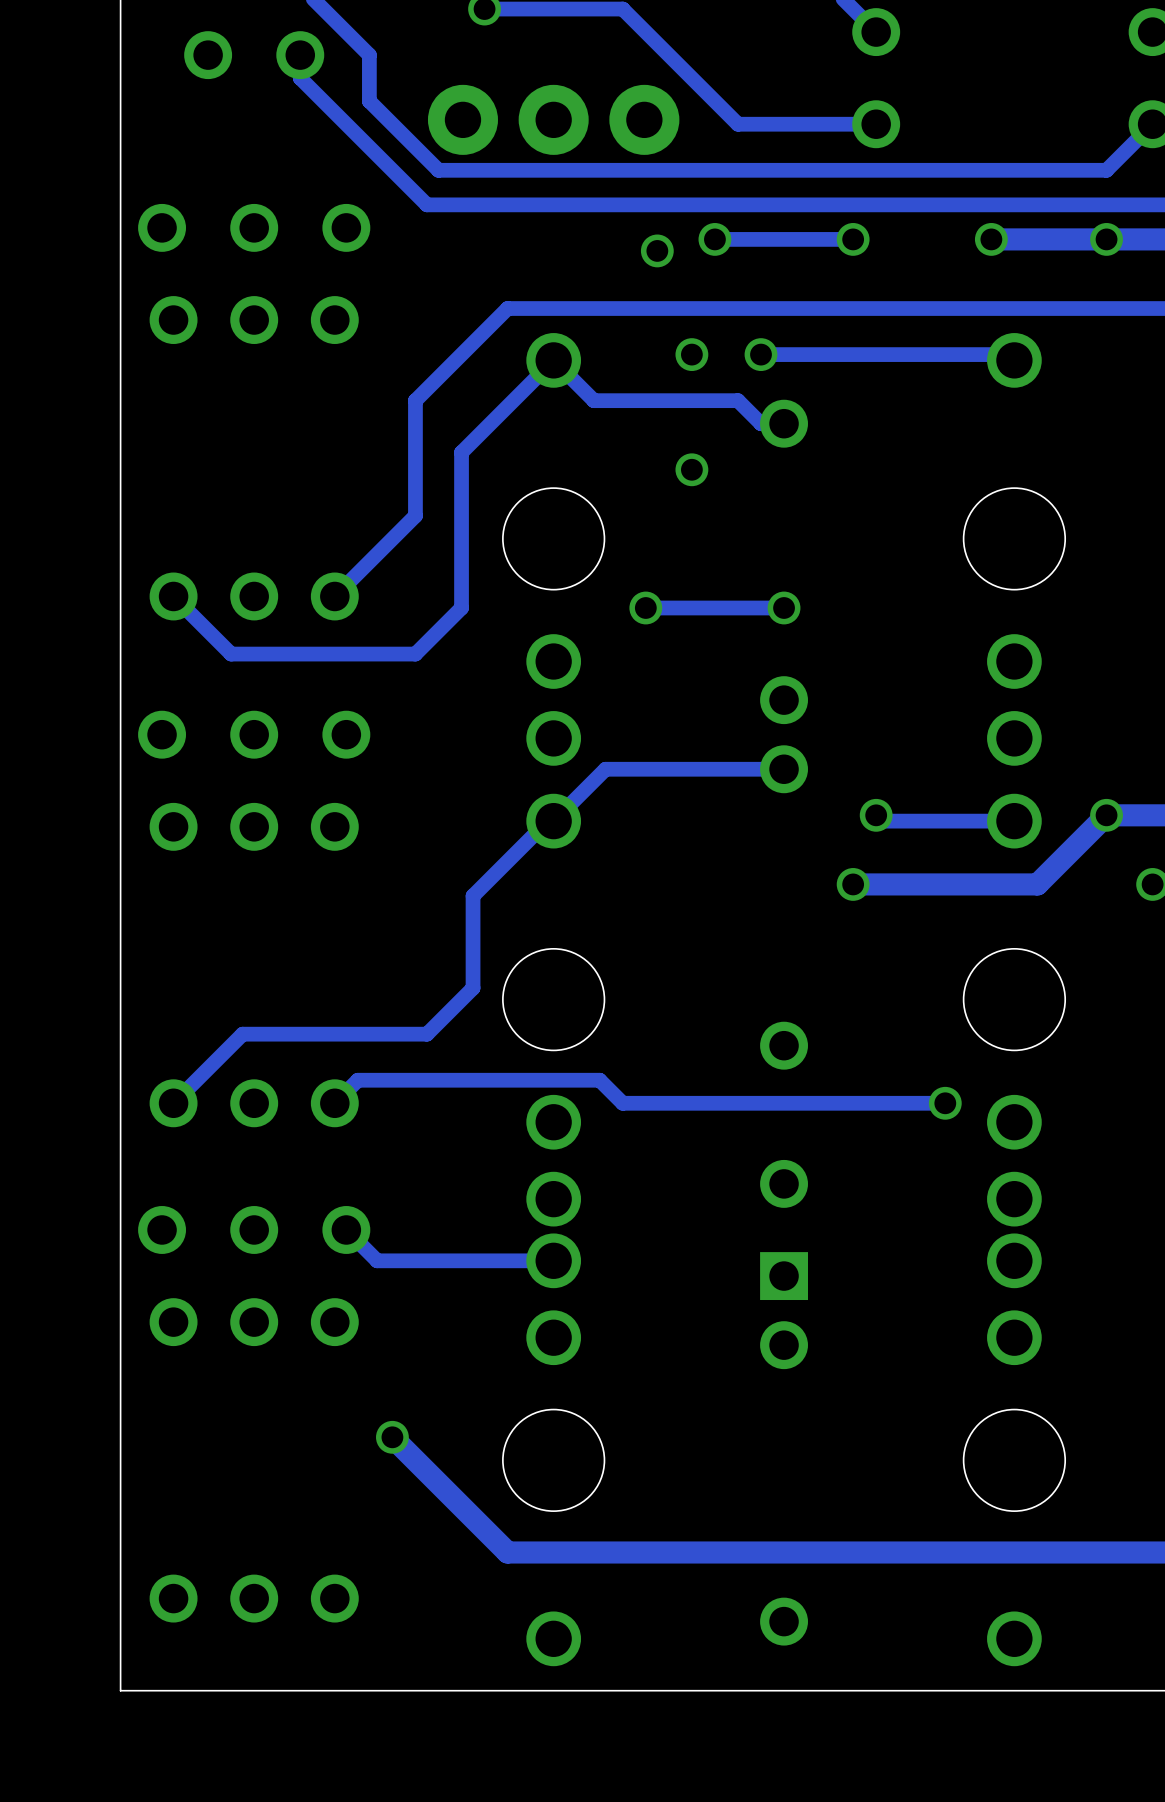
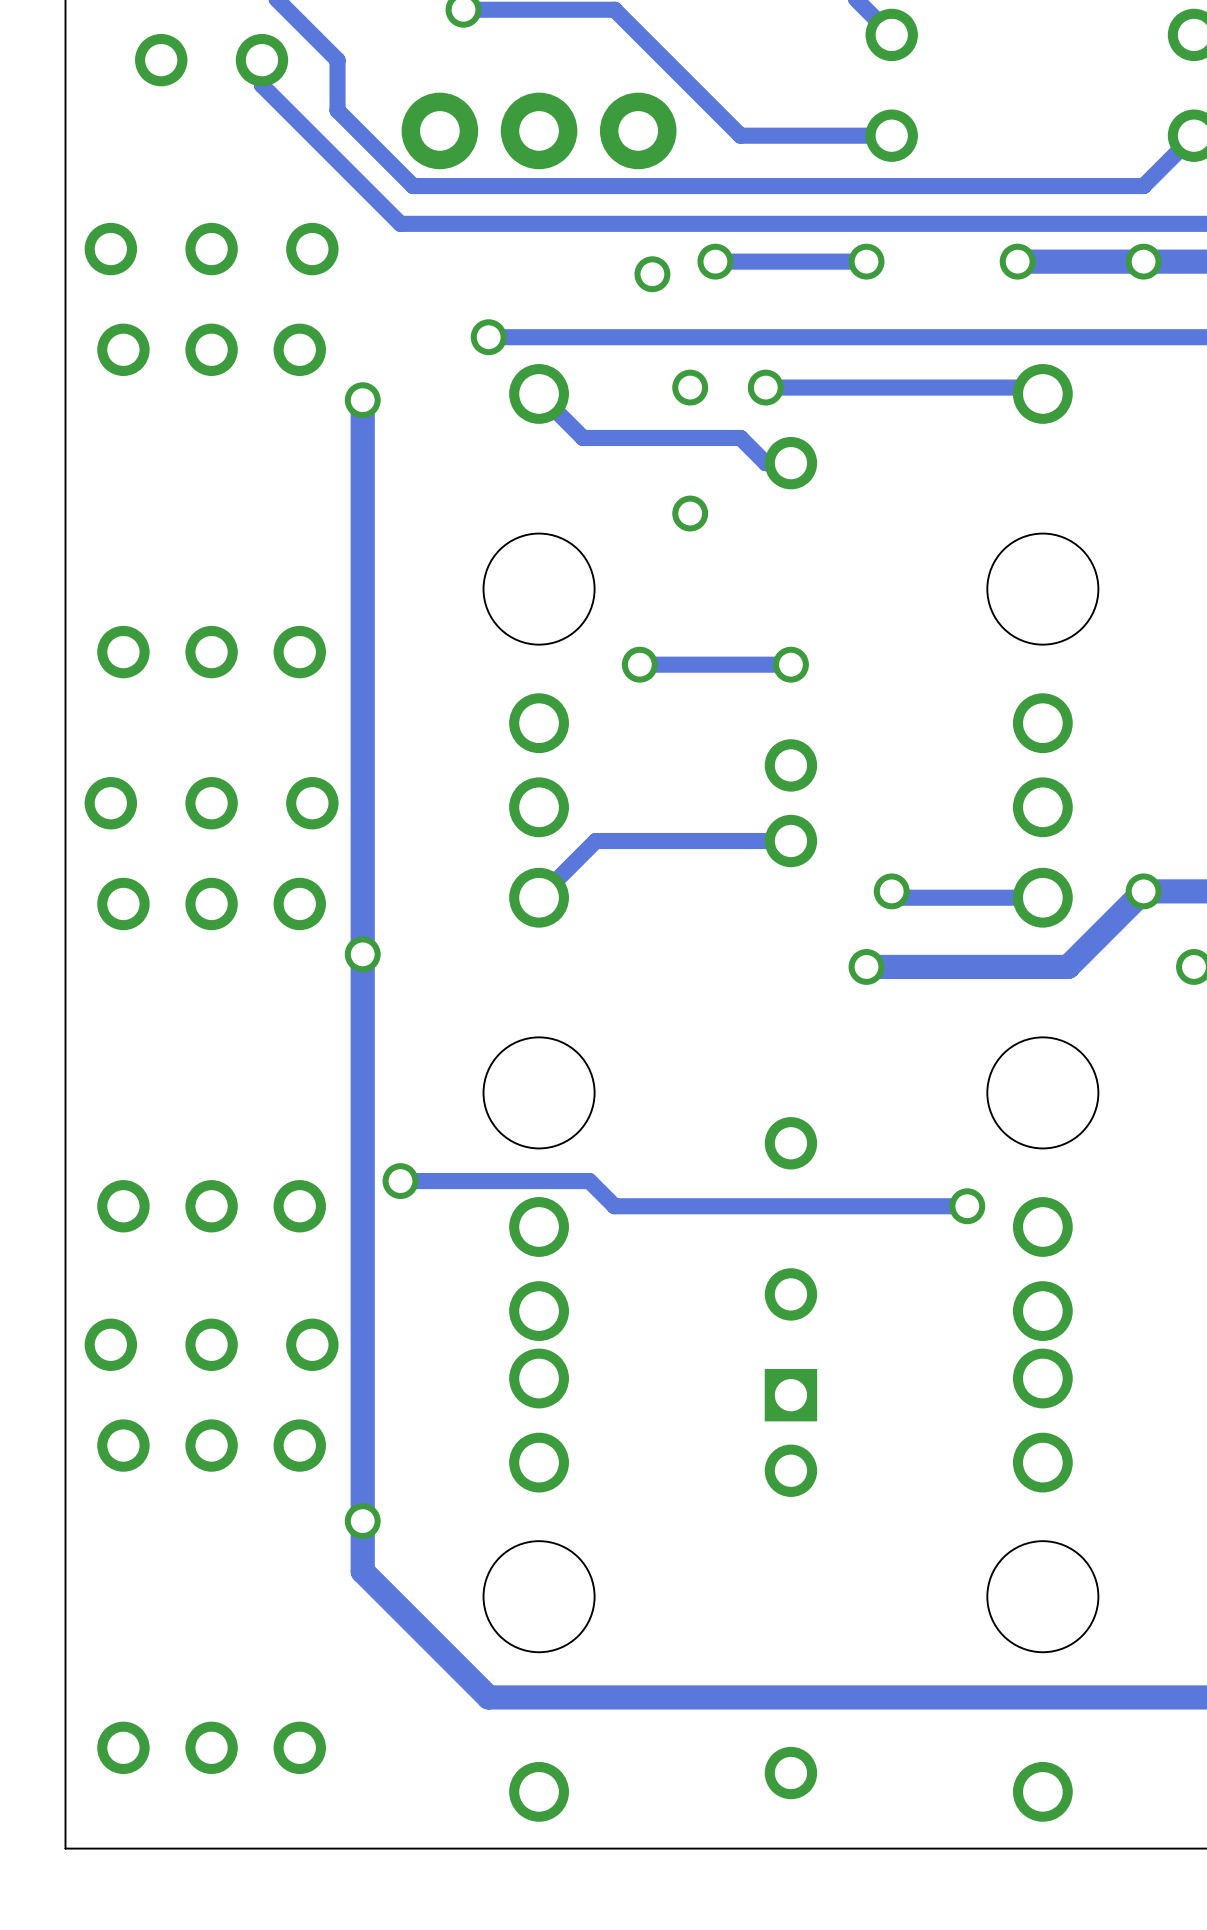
track: (507, 308) (415, 400) (415, 515) (334, 596) -> none
via: none -> (488, 337)
track: (553, 360) (461, 452) (461, 607) (415, 654) (231, 654) (173, 596) -> none
track: none -> (362, 400) (362, 1571)
via: none -> (362, 400)
track: (553, 821) (547, 821) (473, 895) (473, 988) (426, 1034) (242, 1034) (173, 1103) -> none
via: none -> (362, 954)
track: (426, 1080) (357, 1080) (334, 1103) -> none
via: none -> (400, 1181)
track: (346, 1229) (377, 1260) (553, 1260) -> none
via position: (392, 1437) -> (362, 1521)

